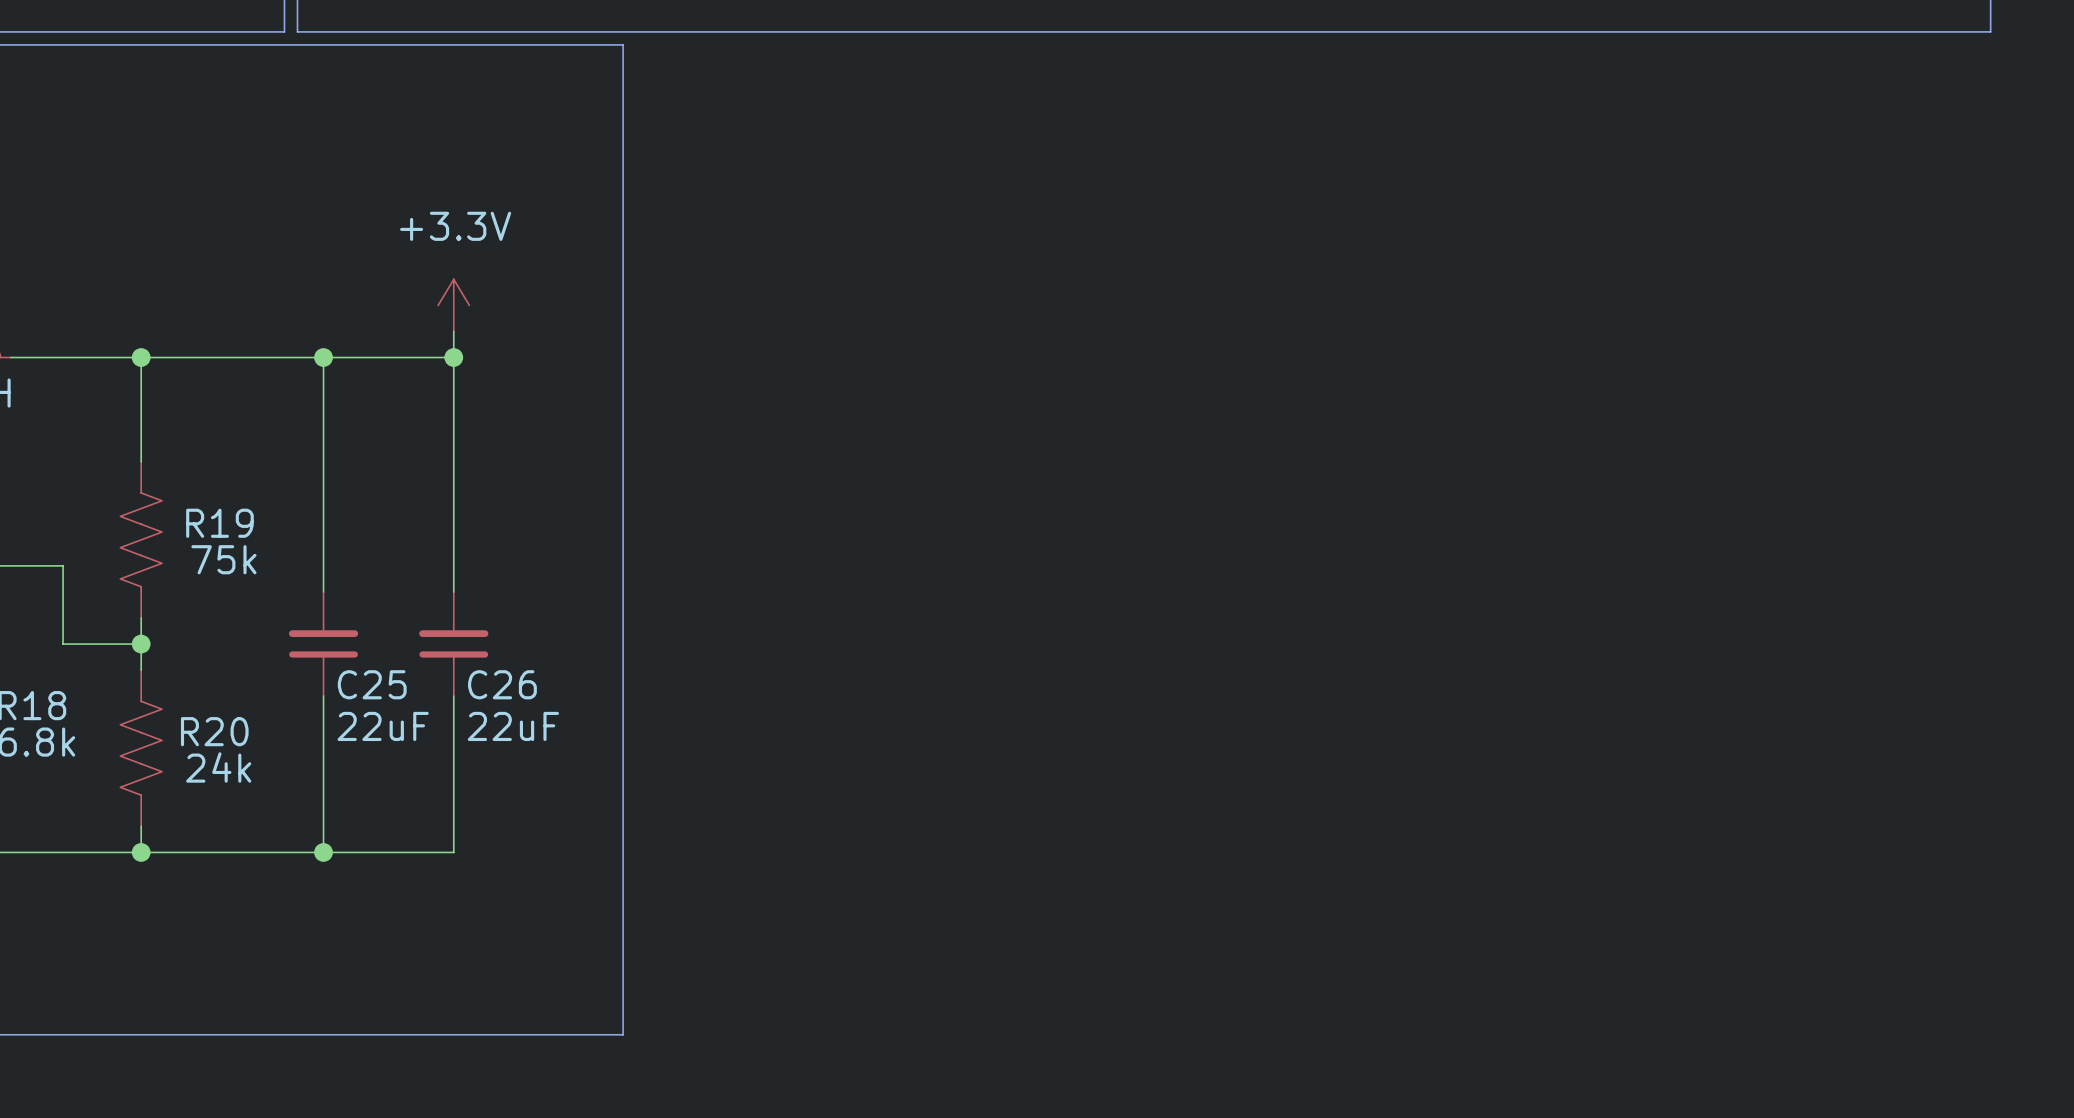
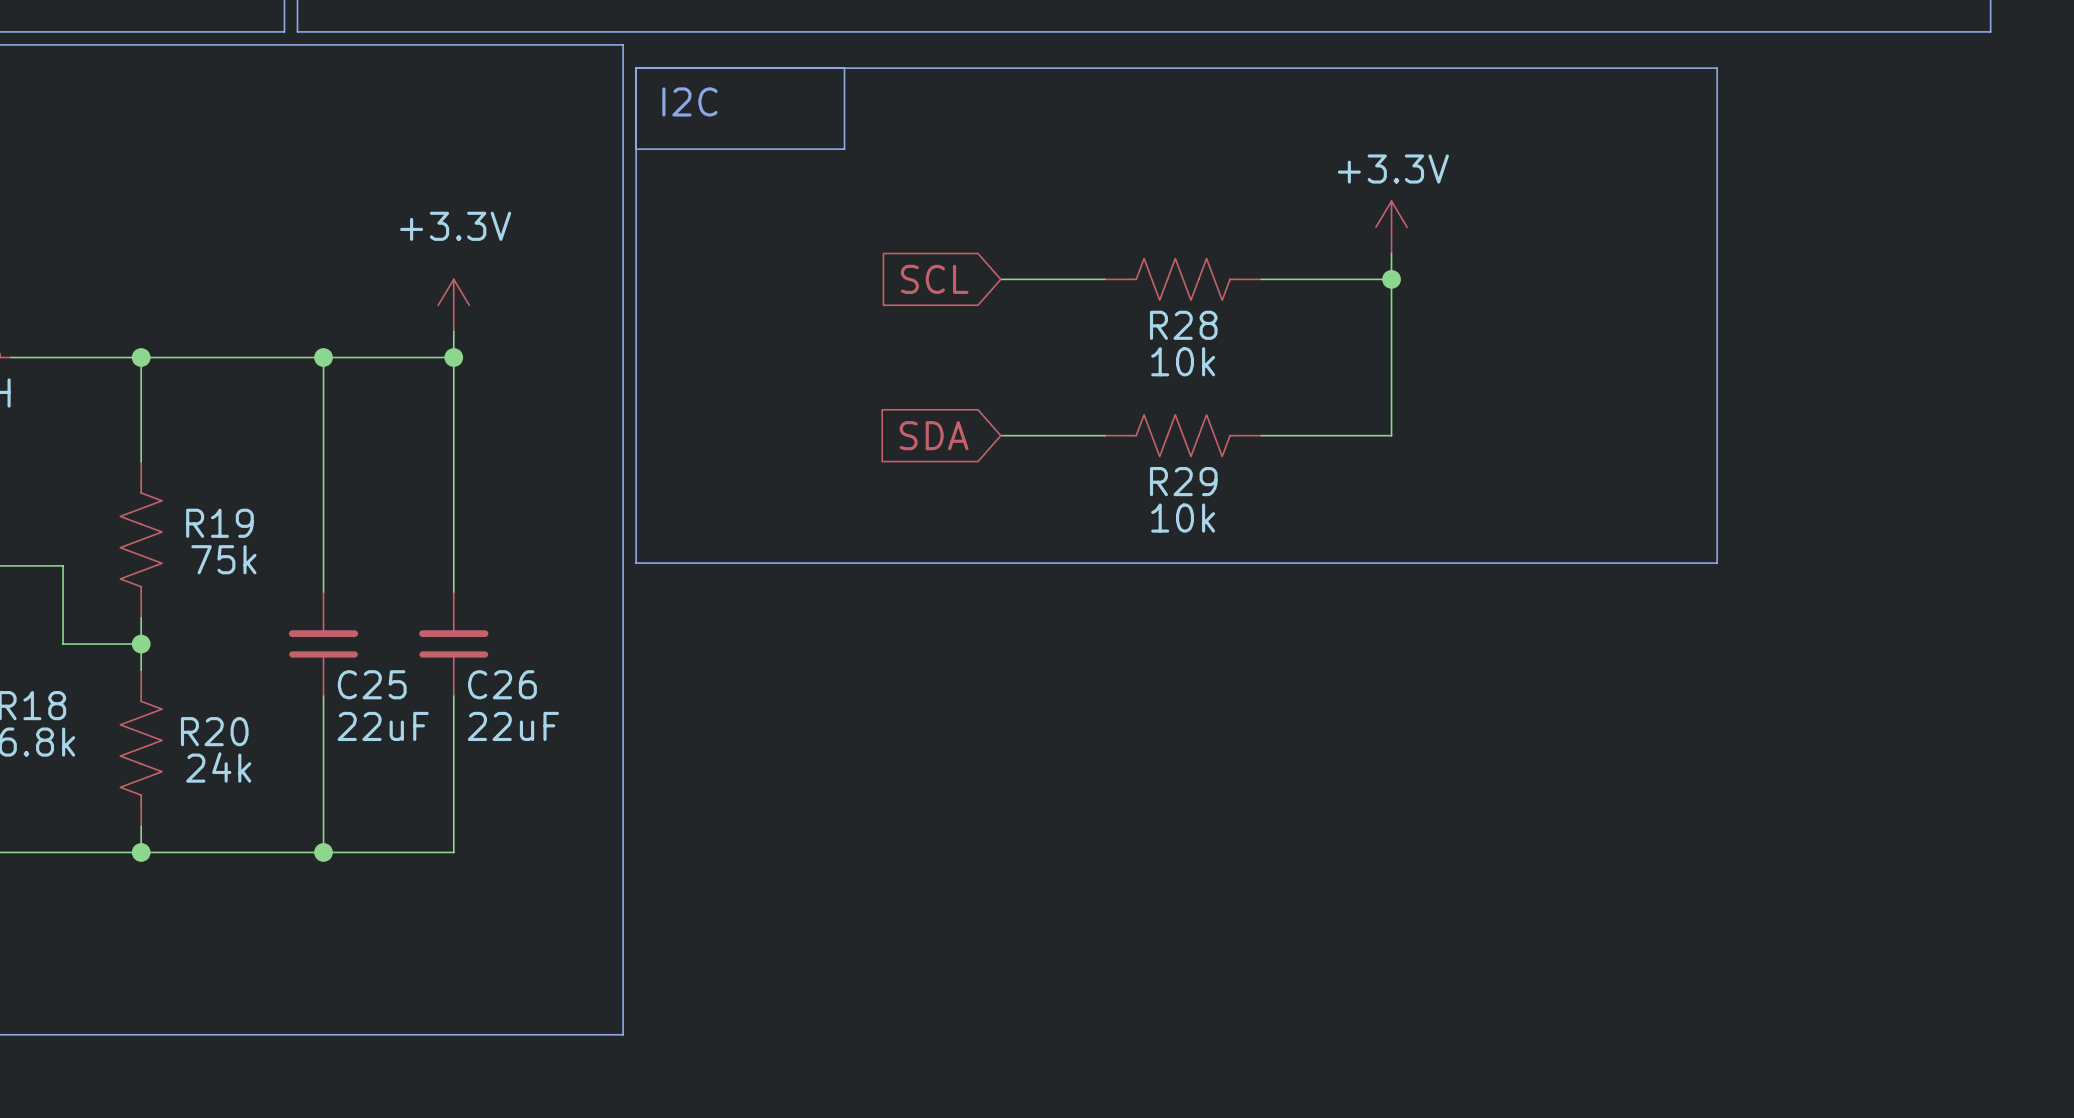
line: none -> (636, 68) (1717, 68) (1717, 563) (636, 563) (636, 68)
line: none -> (844, 68) (844, 149) (636, 149)
text: none -> I2C (689, 101)
power symbol: none -> +3.3V (1391, 227)
wire: none -> (1391, 253) (1391, 435) (1261, 435)
global label: none -> SCL (934, 279)
wire: none -> (1000, 279) (1104, 279)
R28: none -> 10k (1183, 279)
wire: none -> (1261, 279) (1391, 279)
junction: none -> (1391, 279)
global label: none -> SDA (934, 435)
wire: none -> (1000, 435) (1104, 435)
R29: none -> 10k (1183, 435)

